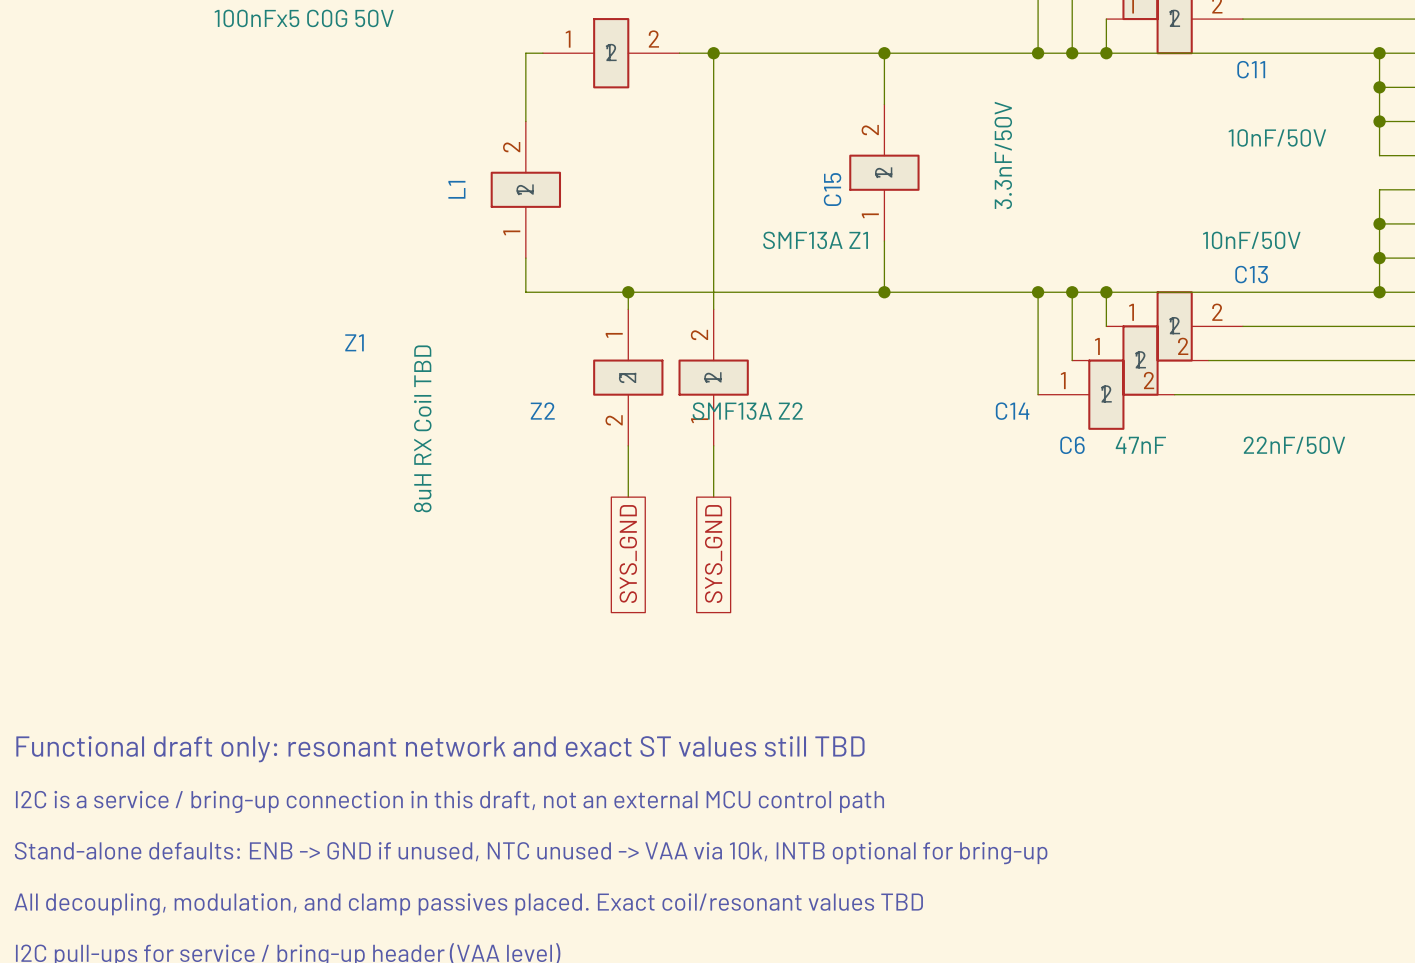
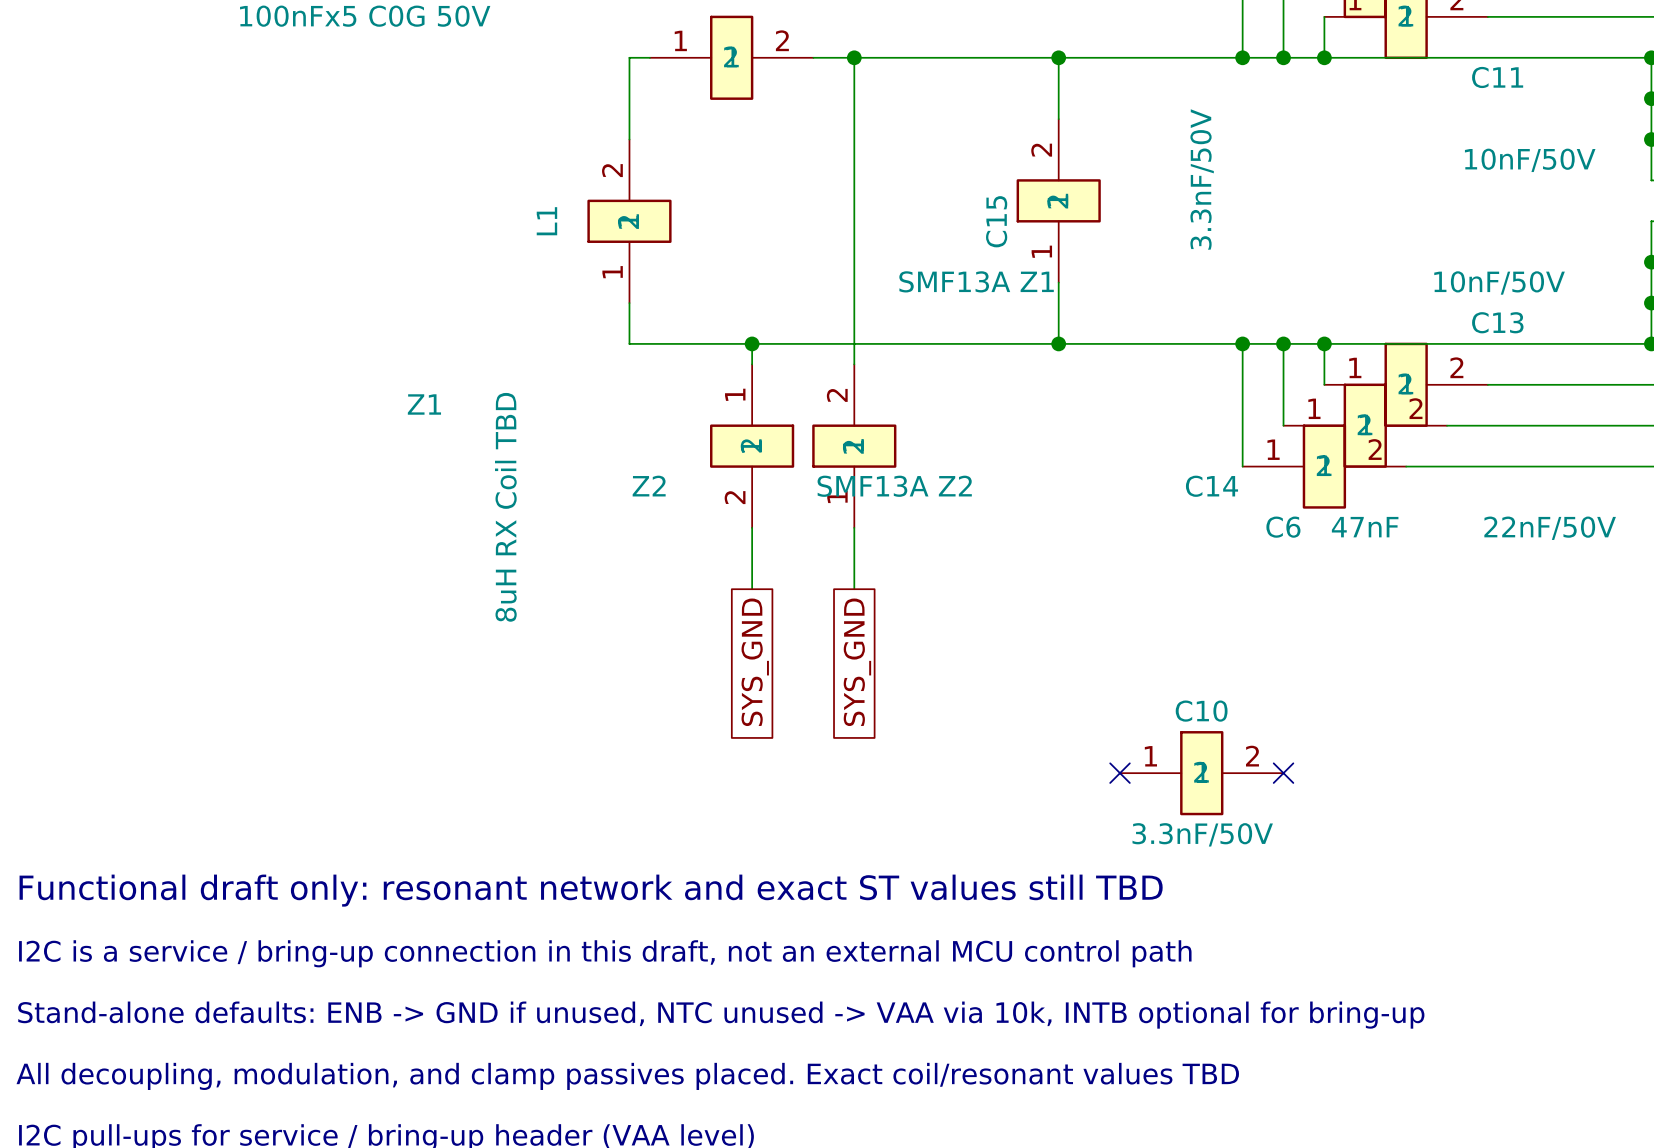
no-connect mark: none -> (1120, 773)
C10: none -> 3.3nF/50V (1201, 773)
no-connect mark: none -> (1283, 773)

